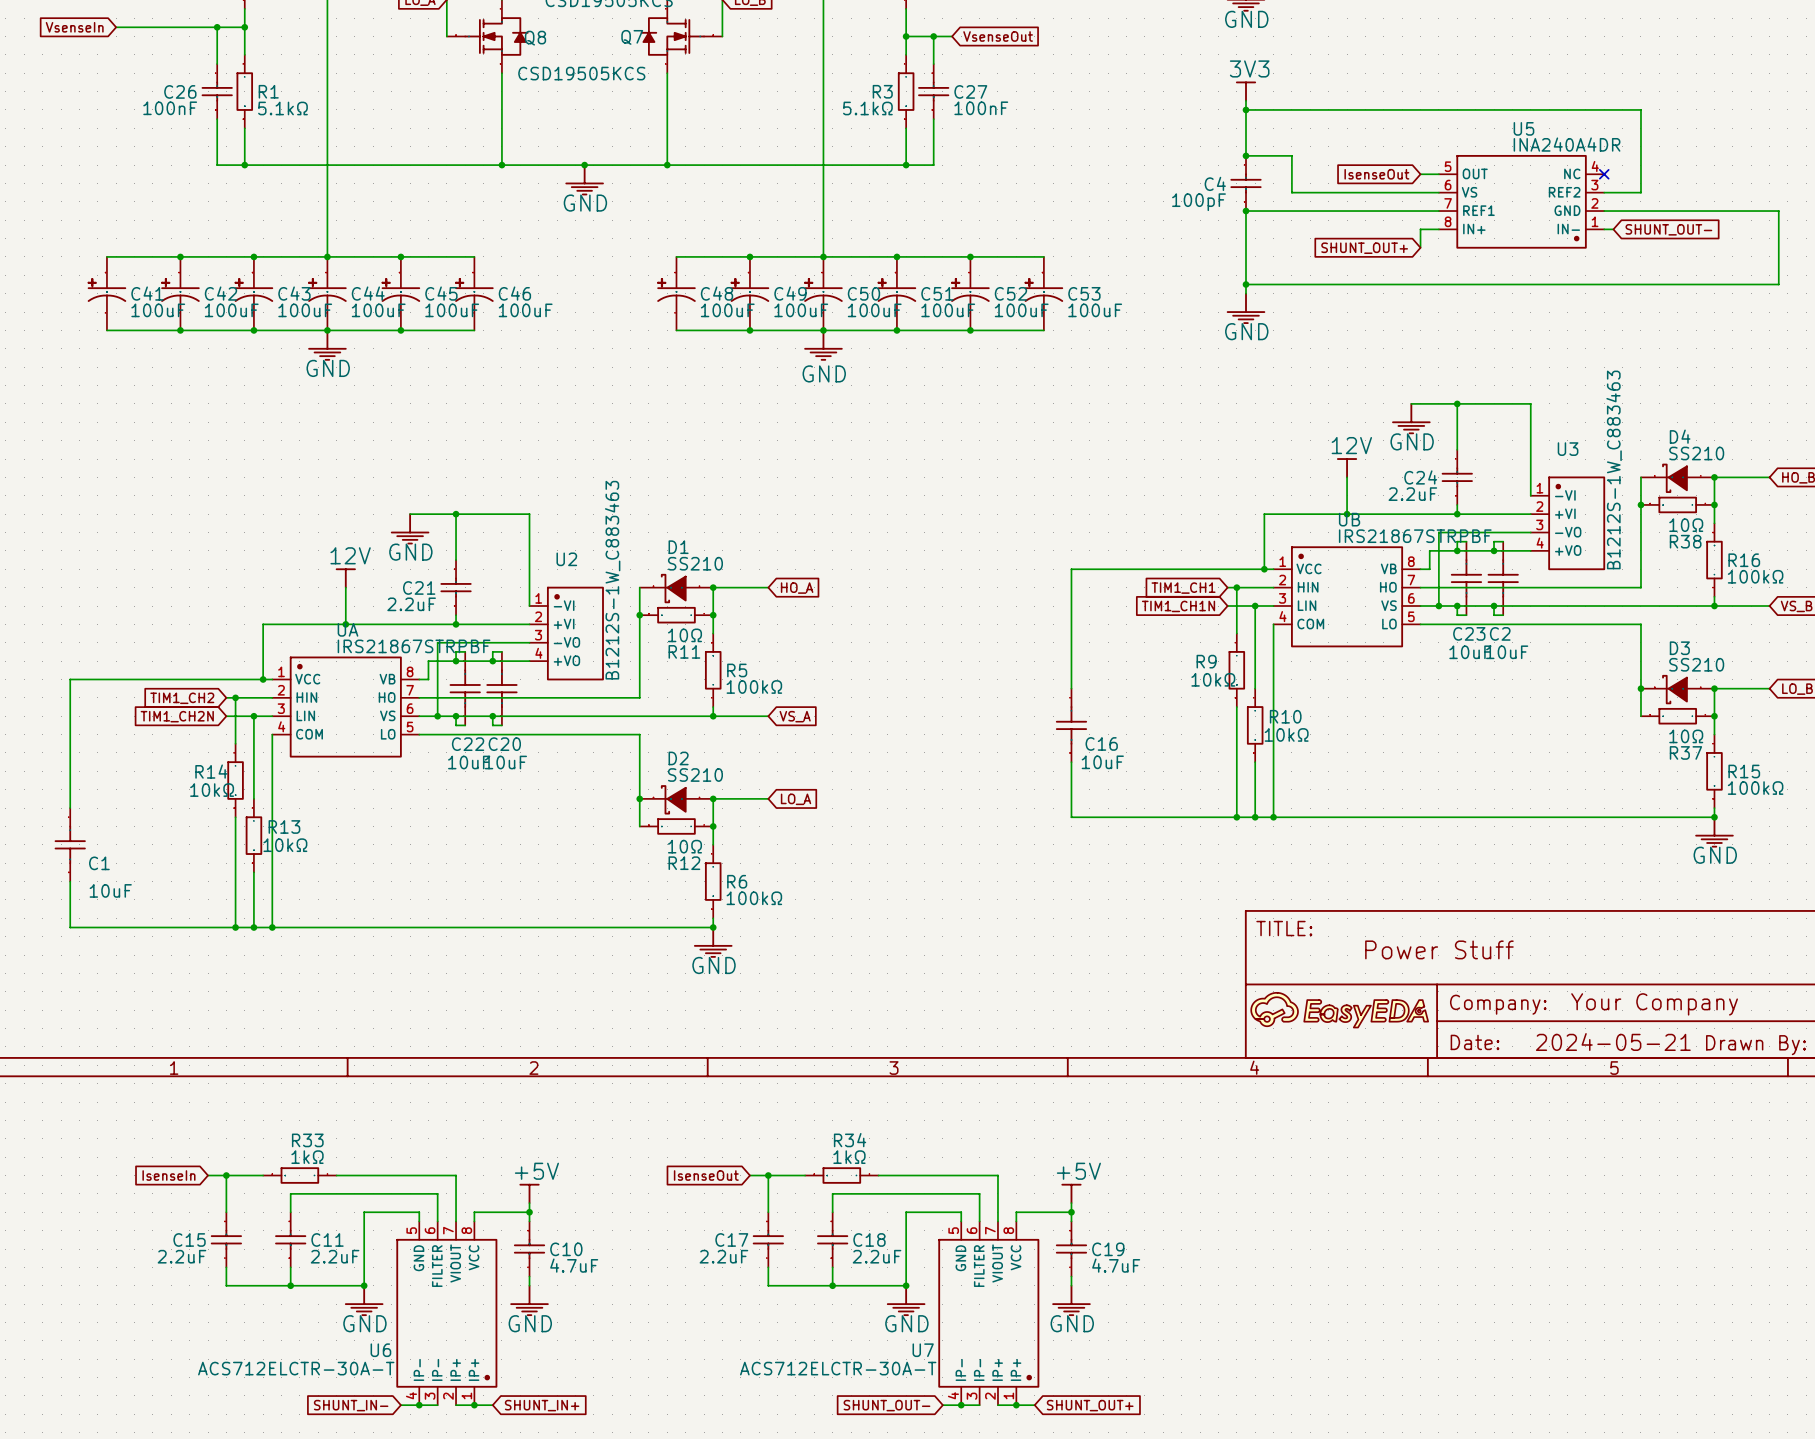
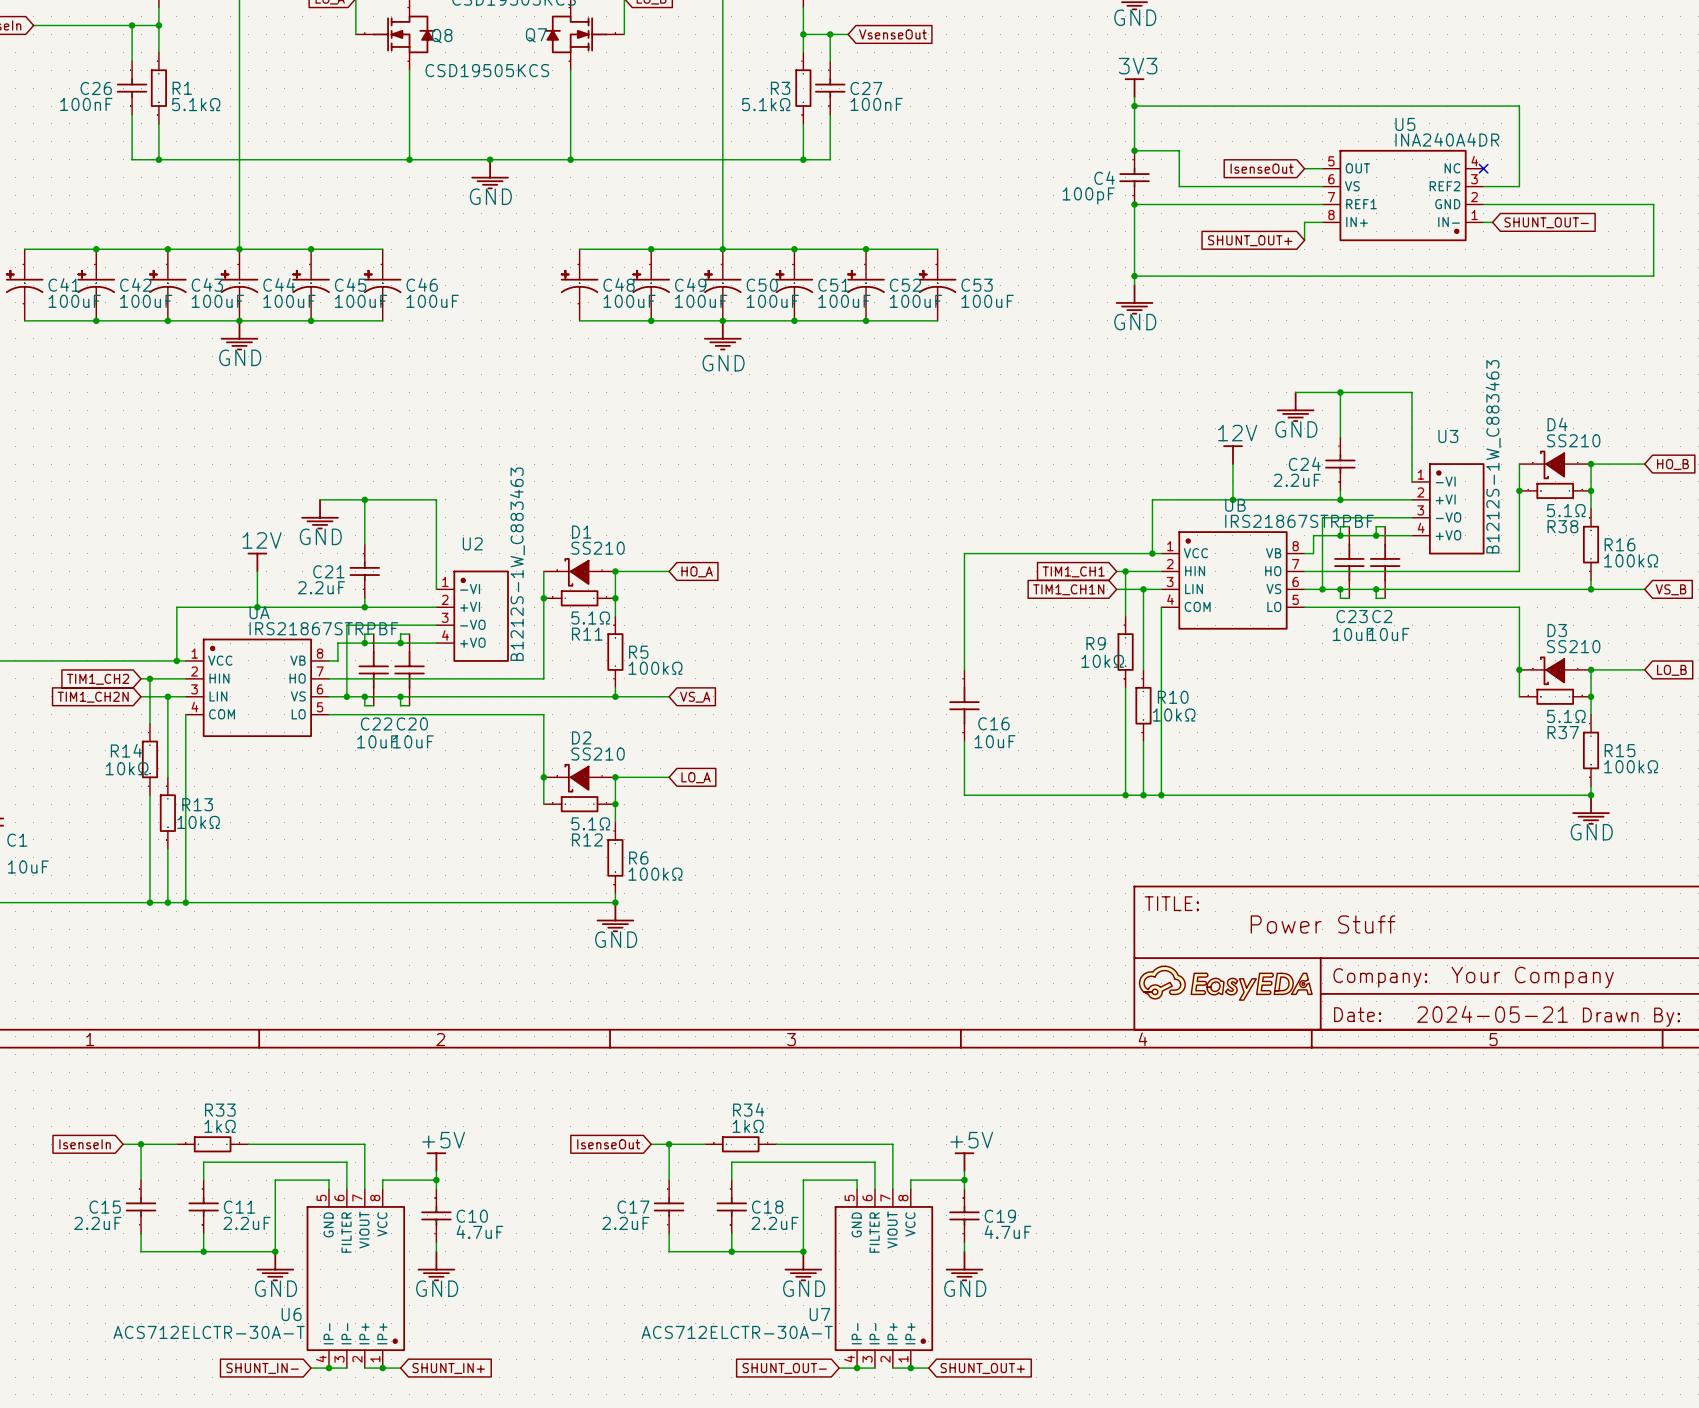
R38 value: 10Ω (1686, 525) -> 5.1Ω (1566, 510)
R11 value: 10Ω (684, 635) -> 5.1Ω (590, 617)
R37 value: 10Ω (1686, 736) -> 5.1Ω (1566, 716)
R12 value: 10Ω (684, 846) -> 5.1Ω (590, 823)

